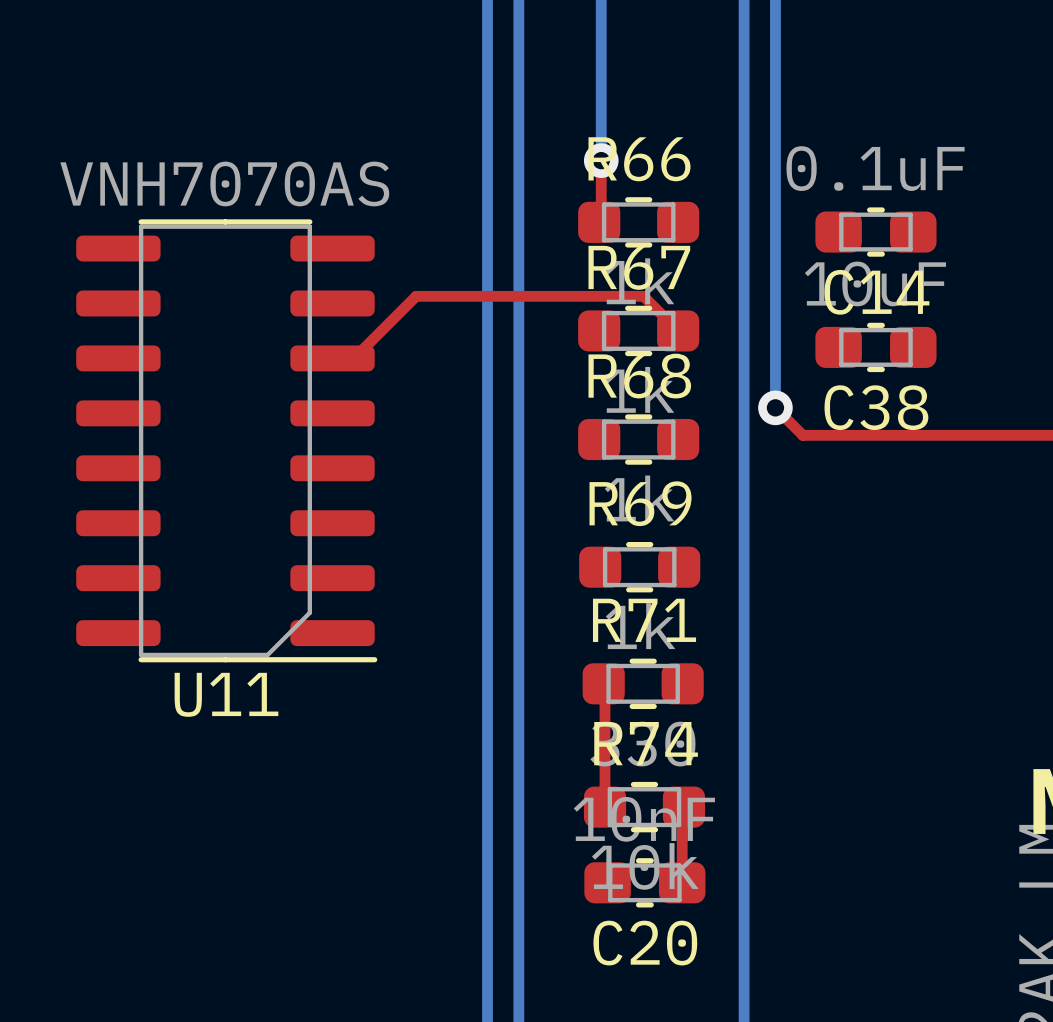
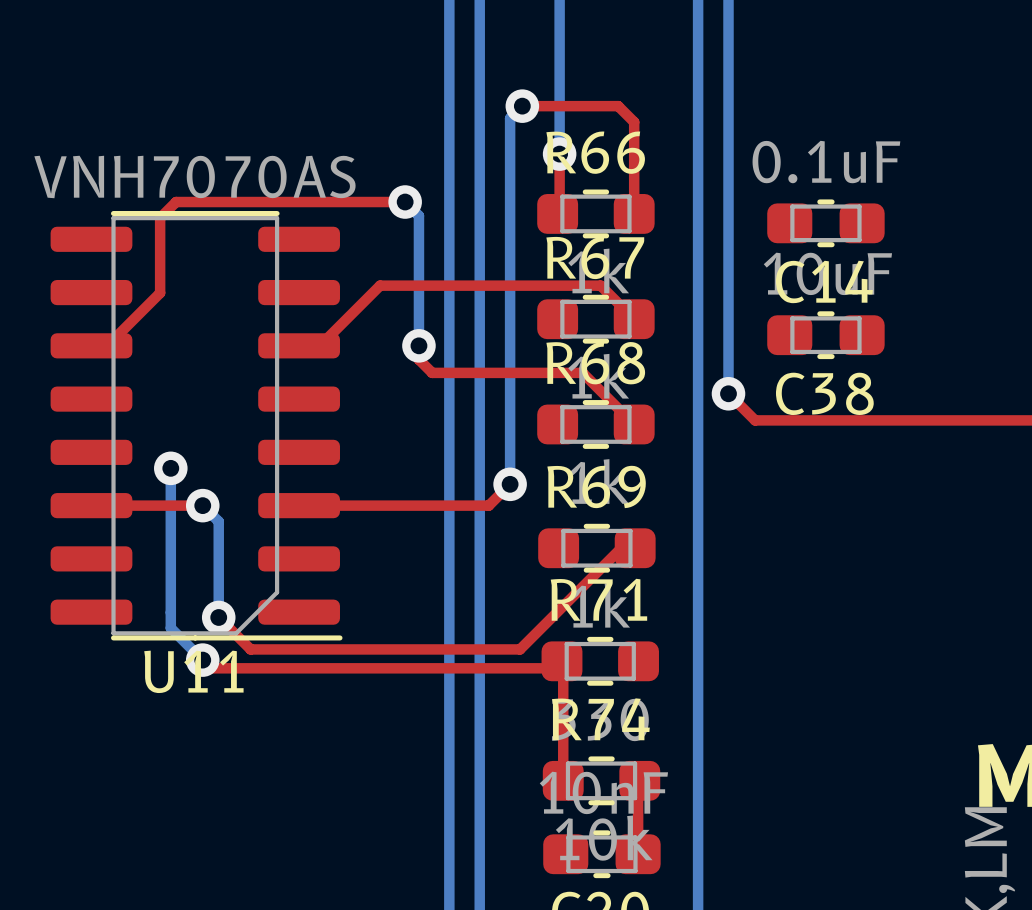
top track: none -> (522, 106) (618, 106) (634, 122) (634, 213)
bottom track: none -> (522, 106) (510, 118) (510, 484)
via: none -> (522, 106)
top track: none -> (405, 202) (176, 202) (160, 218) (160, 292) (107, 345) (91, 345)
bottom track: none -> (405, 202) (418, 215) (418, 345)
via: none -> (405, 202)
top track: none -> (418, 345) (418, 359) (432, 372) (582, 372) (634, 424)
via: none -> (418, 345)
bottom track: none -> (170, 468) (170, 628) (202, 660)
via: none -> (170, 468)
top track: none -> (510, 484) (488, 505) (299, 505)
via: none -> (510, 484)
top track: none -> (91, 505) (202, 505)
bottom track: none -> (202, 505) (218, 521) (218, 617)
via: none -> (202, 505)
top track: none -> (635, 548) (621, 548) (520, 649) (250, 649) (218, 617)
via: none -> (218, 617)
top track: none -> (202, 660) (210, 668) (554, 668) (561, 661)
via: none -> (202, 660)

